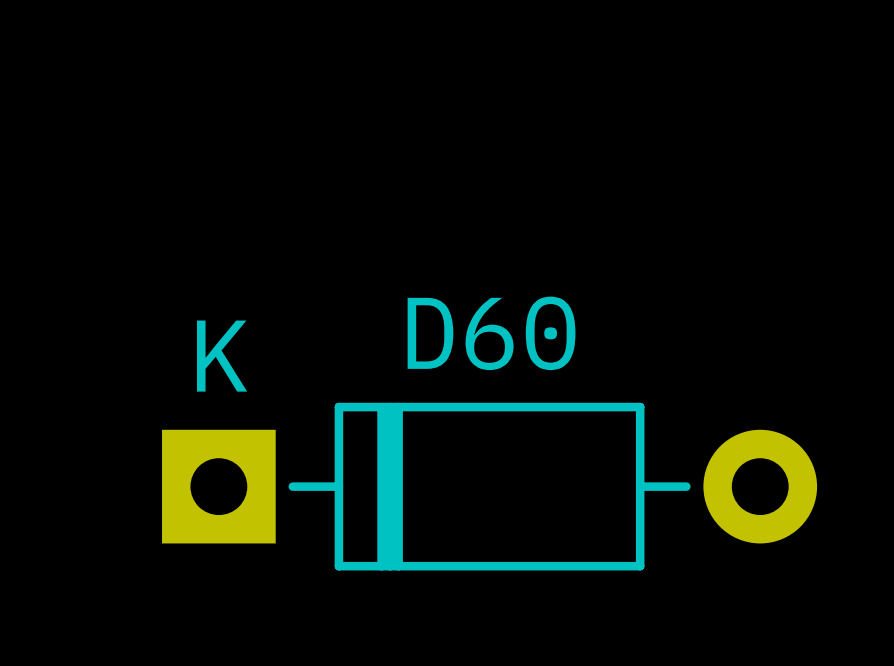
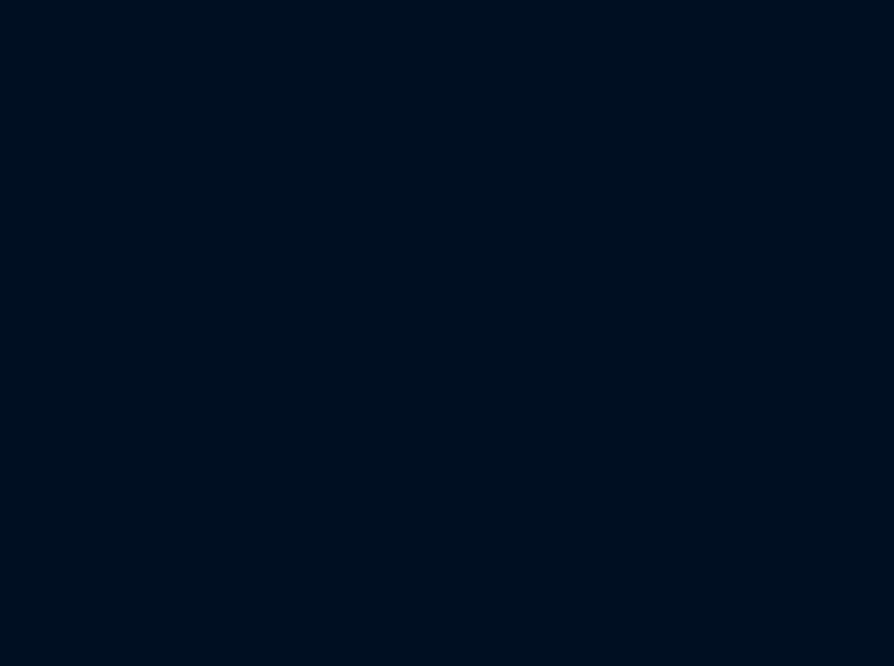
D60: (489, 486) -> none

